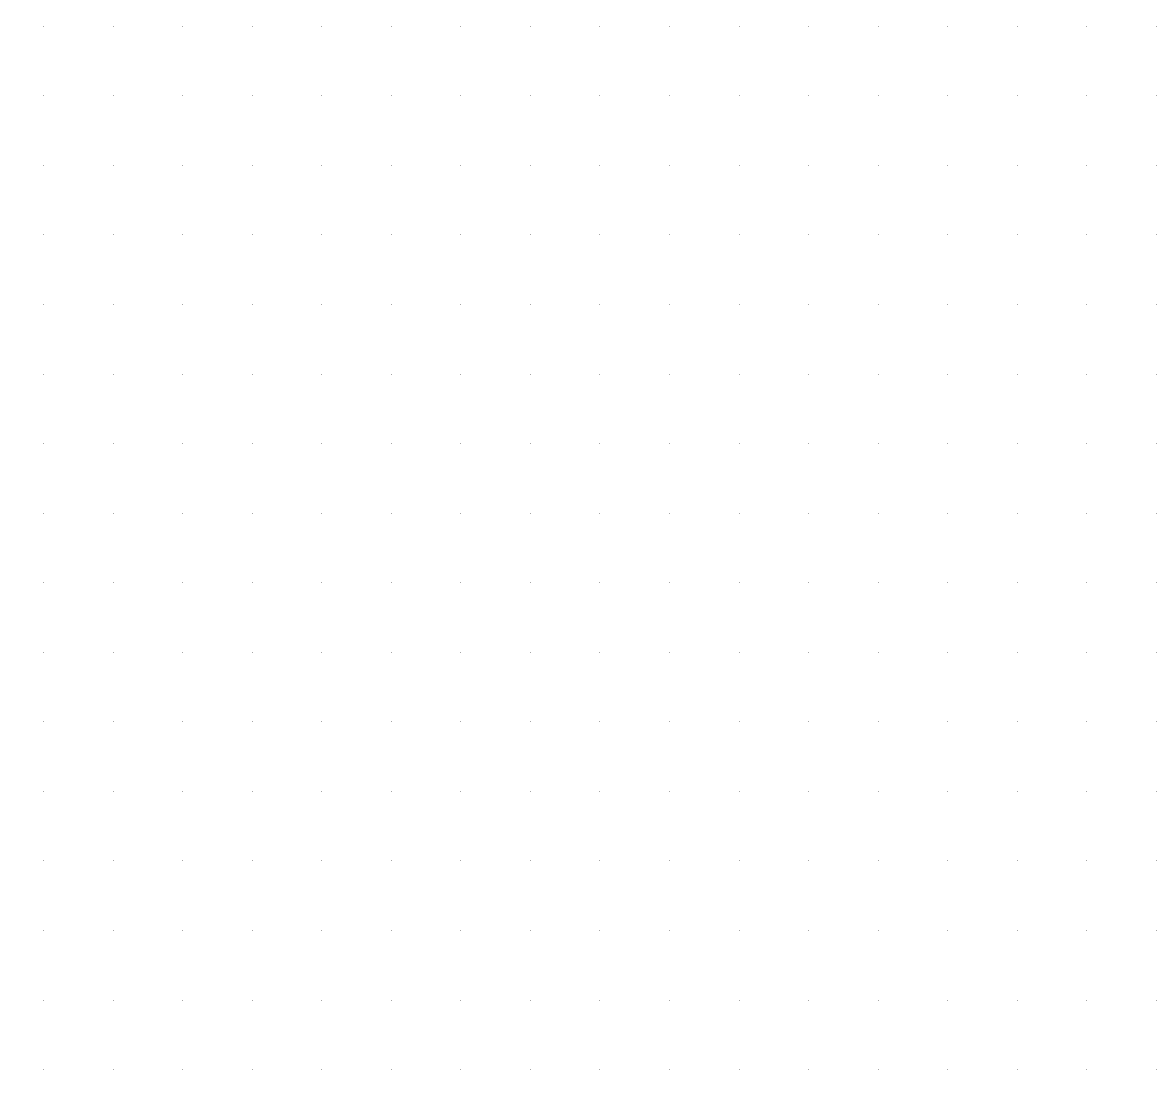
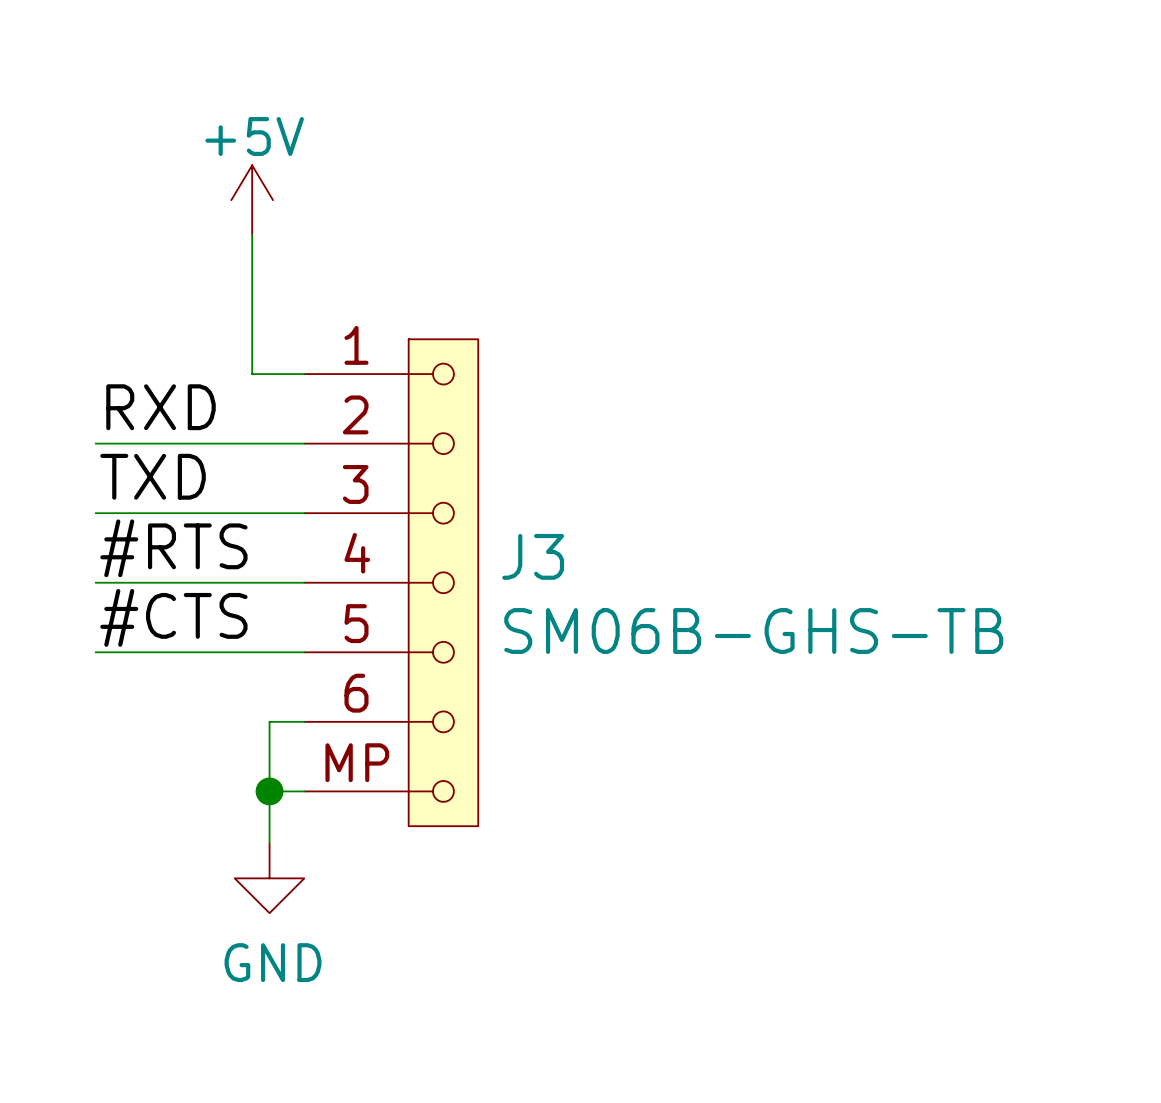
power symbol: none -> +5V (252, 200)
wire: none -> (252, 234) (252, 374) (304, 374)
label: none -> RXD (161, 407)
wire: none -> (95, 443) (304, 443)
label: none -> TXD (153, 476)
wire: none -> (95, 513) (304, 513)
label: none -> #RTS (173, 548)
wire: none -> (95, 582) (304, 582)
J3: none -> SM06B-GHS-TB (391, 582)
label: none -> #CTS (173, 617)
wire: none -> (95, 652) (304, 652)
wire: none -> (304, 721) (269, 721) (269, 843)
wire: none -> (269, 791) (304, 791)
junction: none -> (269, 791)
power symbol: none -> GND (269, 878)

